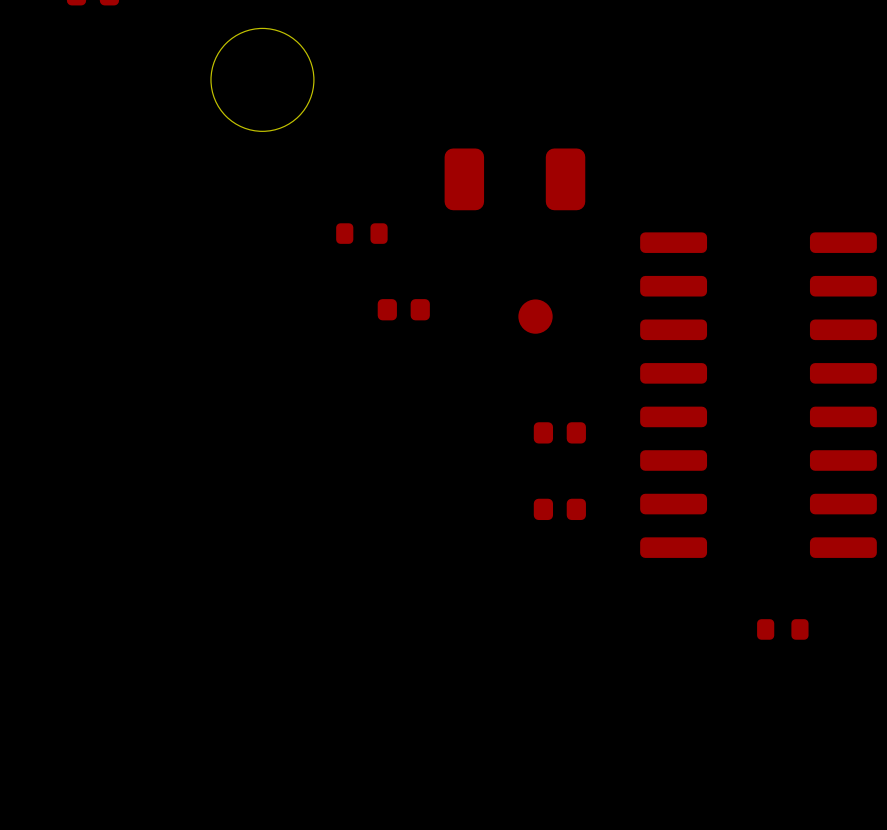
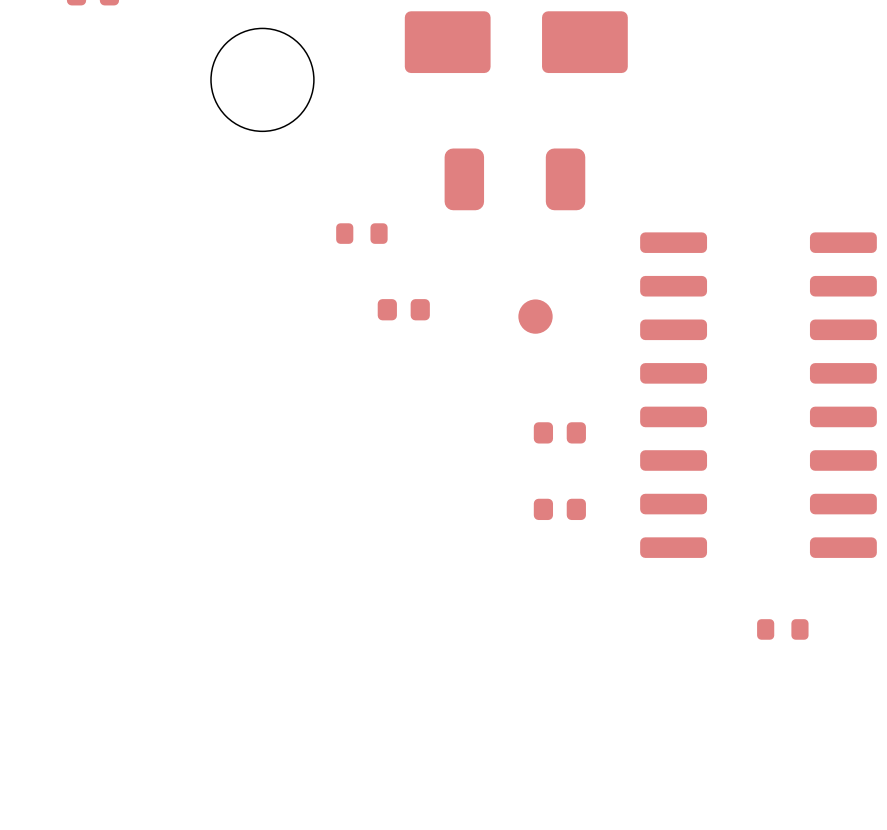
part: none -> (516, 42)

